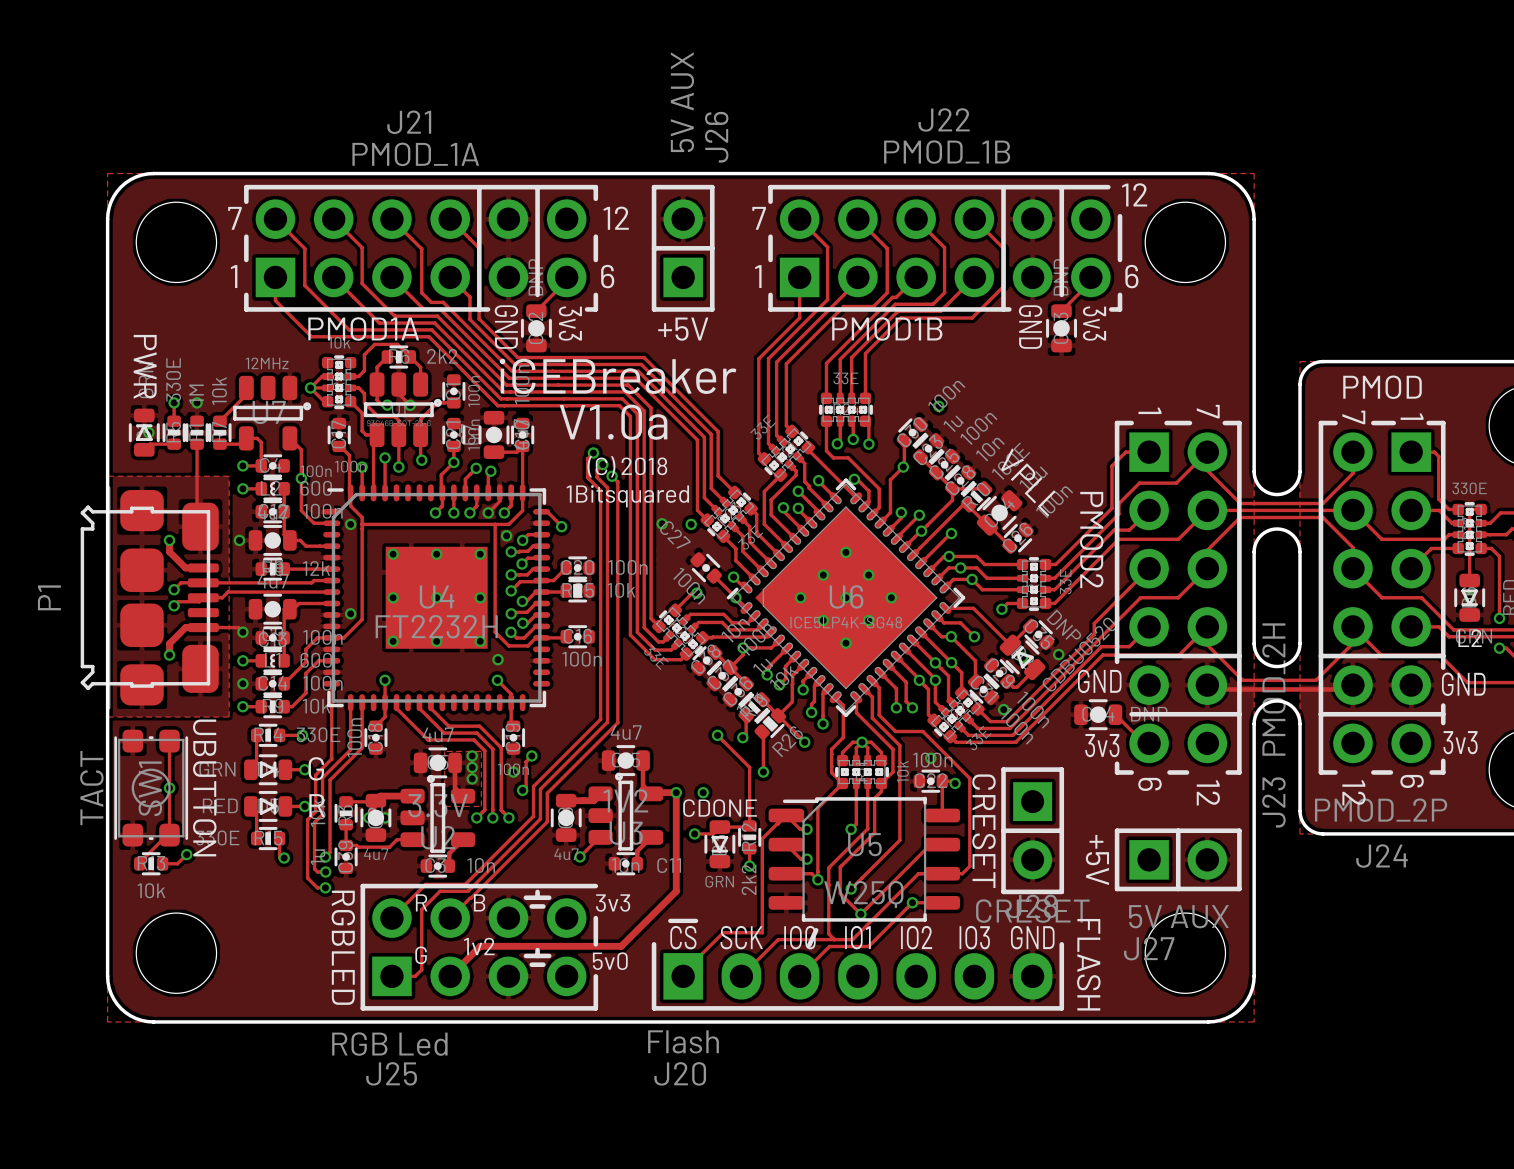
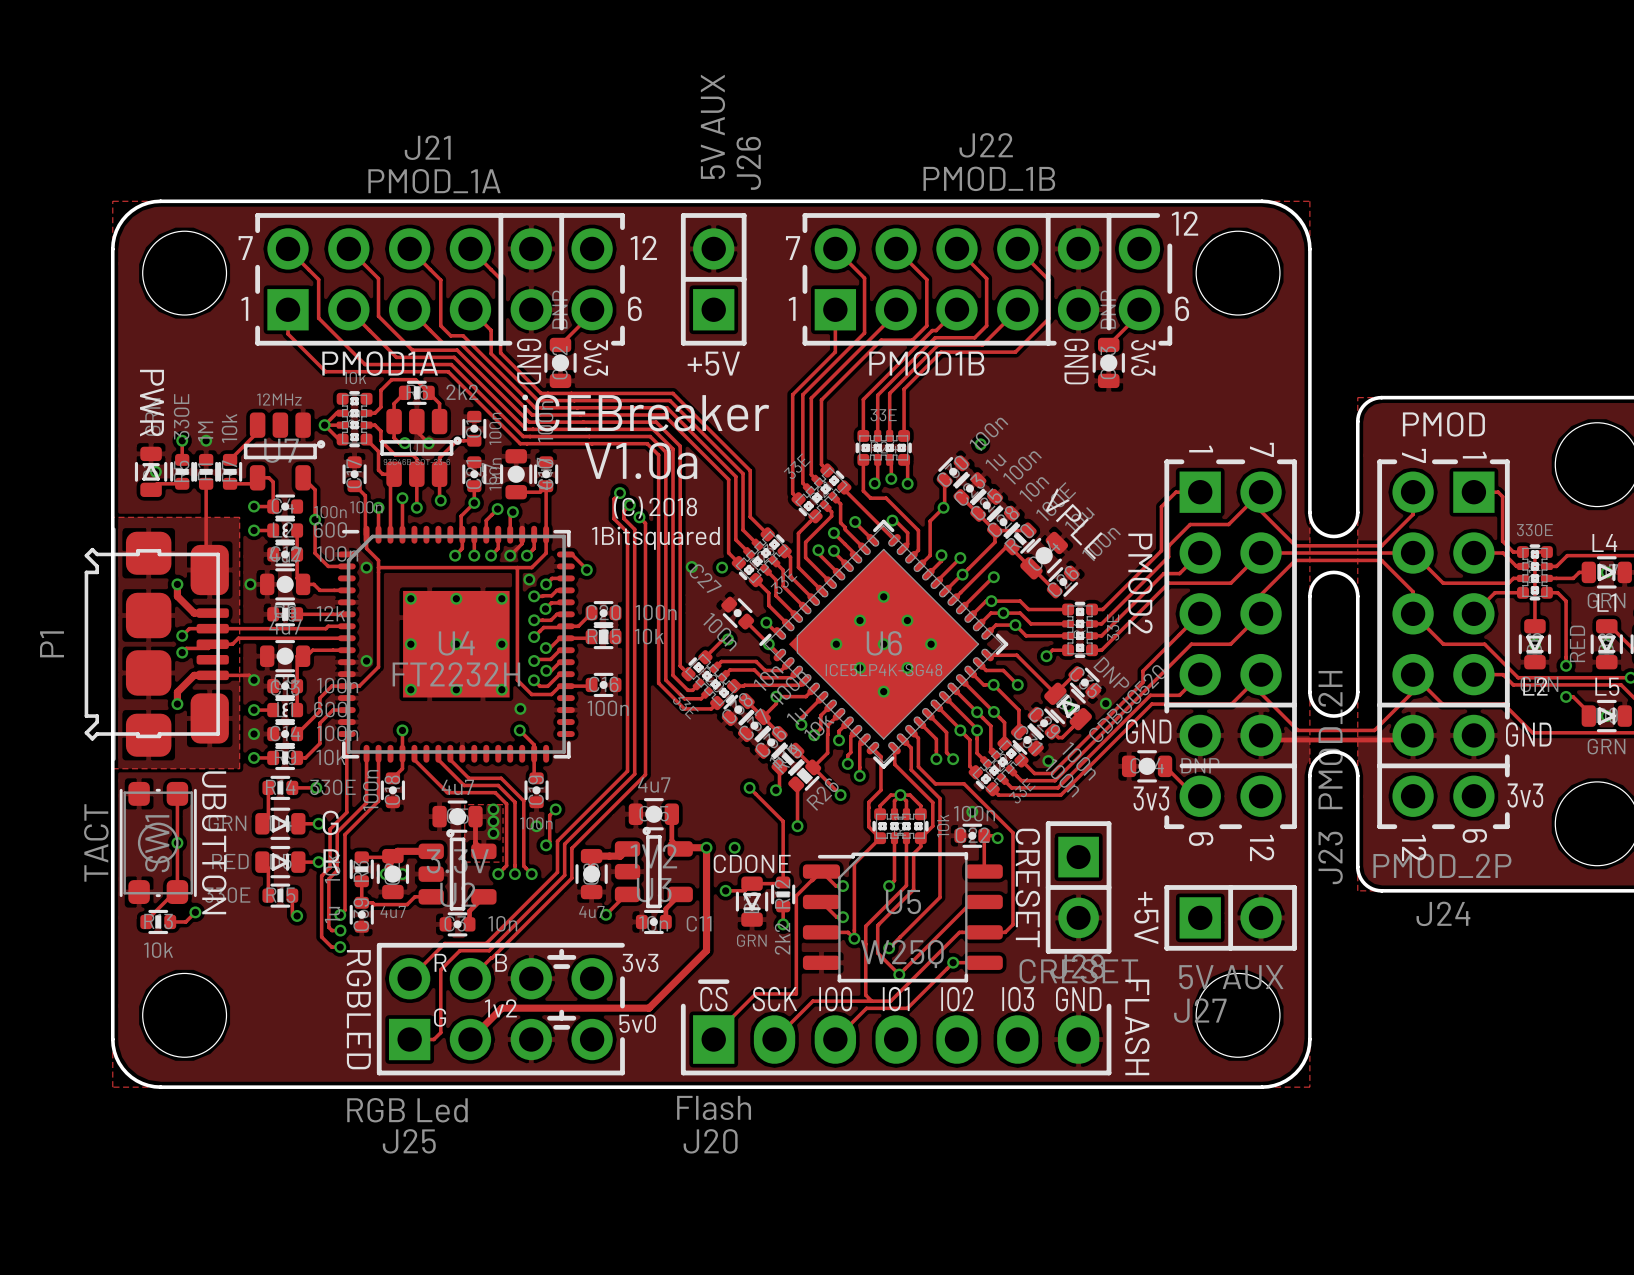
line: (816, 930) (809, 945) -> none

